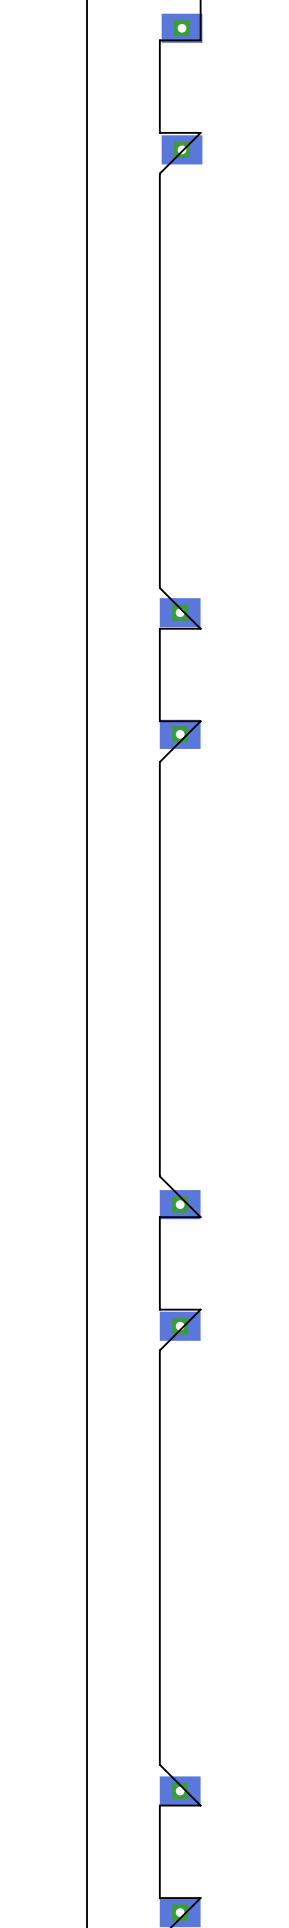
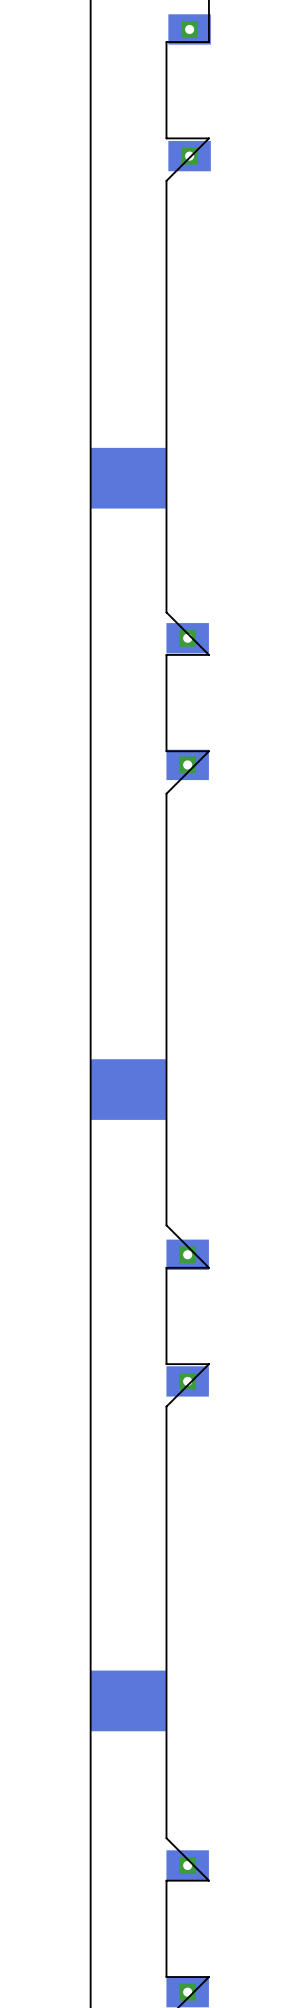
part: none -> (127, 478)
part: none -> (127, 1089)
part: none -> (127, 1700)

